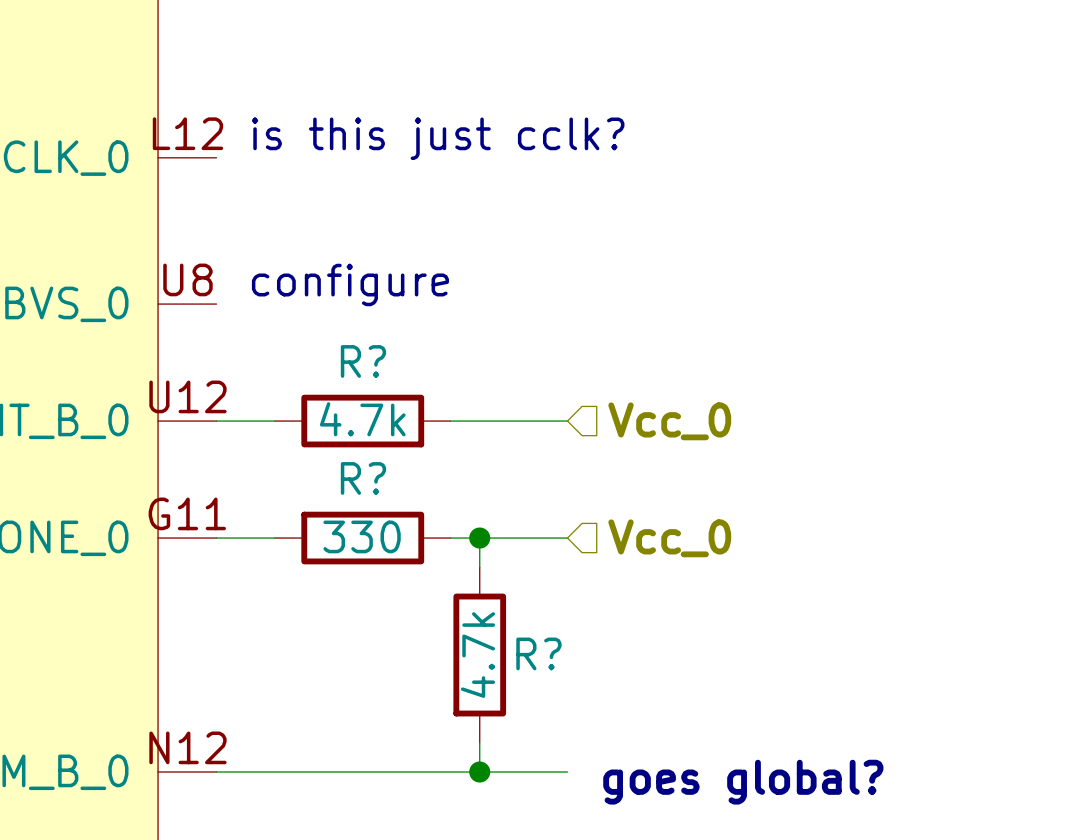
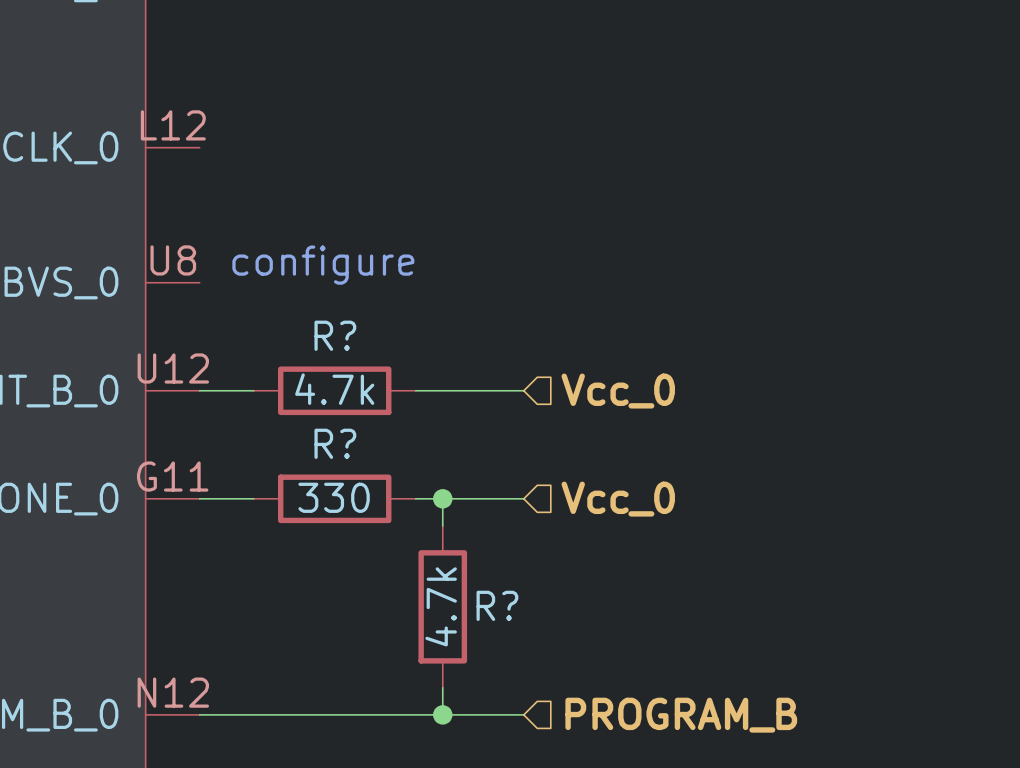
text: is this just cclk? (438, 138) -> none
hierarchical label: none -> PROGRAM_B (681, 715)
text: goes global? (743, 782) -> none

